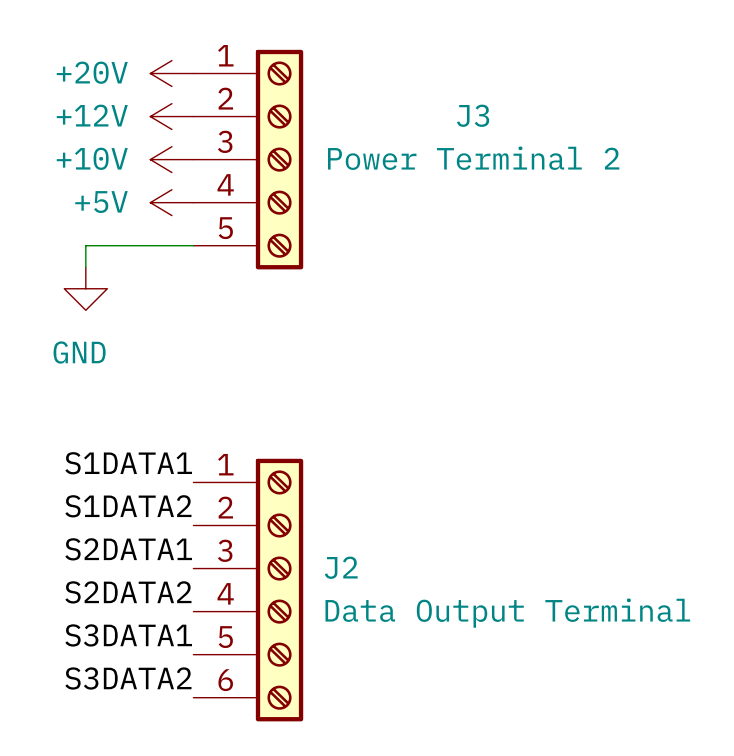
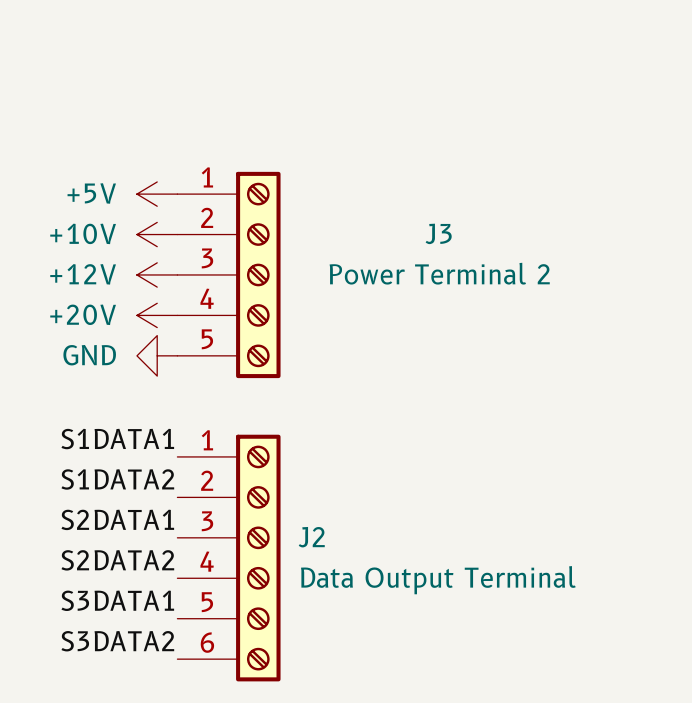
power symbol position: +20V (171, 73) -> +20V (157, 315)
power symbol position: +12V (171, 116) -> +12V (157, 274)
power symbol position: +10V (171, 159) -> +10V (157, 234)
J3 position: (248, 159) -> (228, 274)
wire: (193, 245) (85, 245) (85, 267) -> none
power symbol rotation: 0° (85, 288) -> 90° clockwise (157, 355)
power symbol position: GND (85, 288) -> GND (157, 355)

